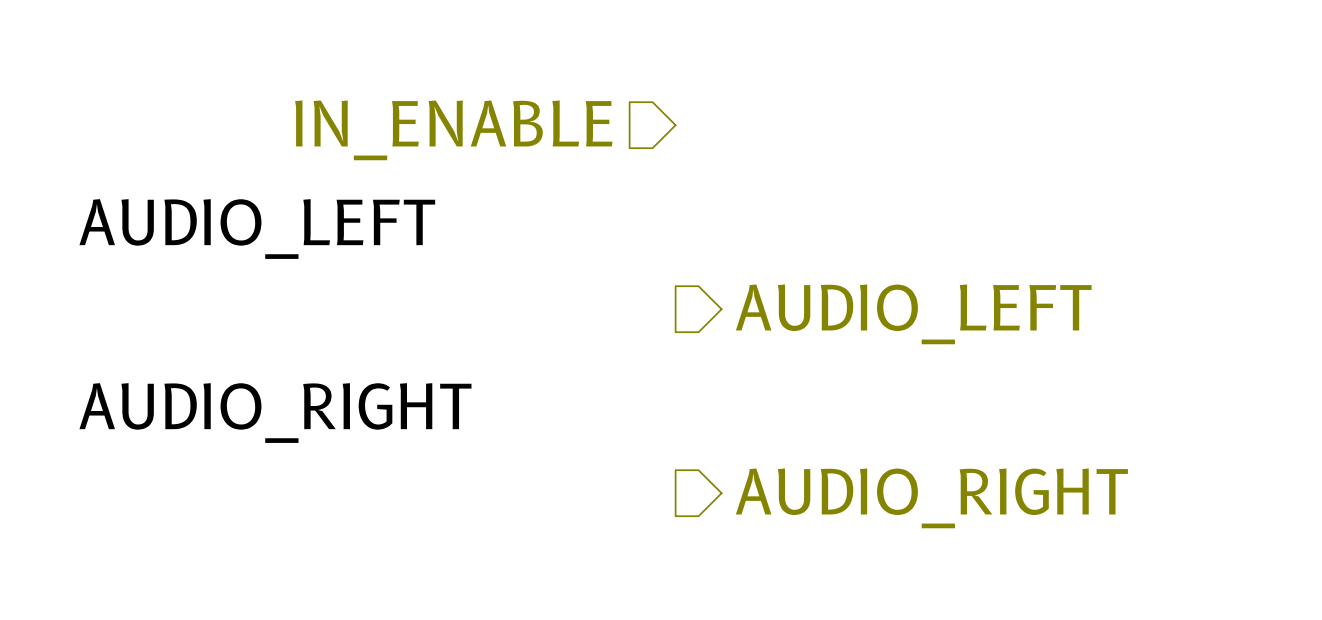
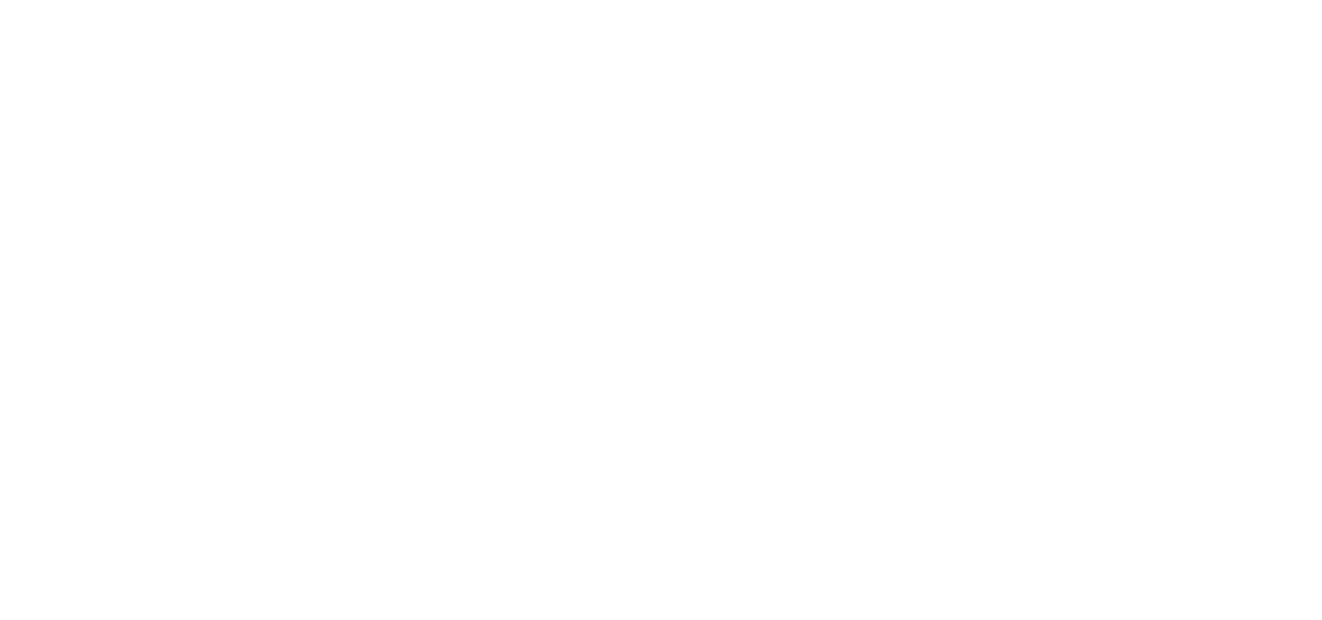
hierarchical label: IN_ENABLE (453, 130) -> none
label: AUDIO_LEFT (257, 229) -> none
hierarchical label: AUDIO_LEFT (913, 314) -> none
label: AUDIO_RIGHT (275, 413) -> none
hierarchical label: AUDIO_RIGHT (931, 498) -> none

